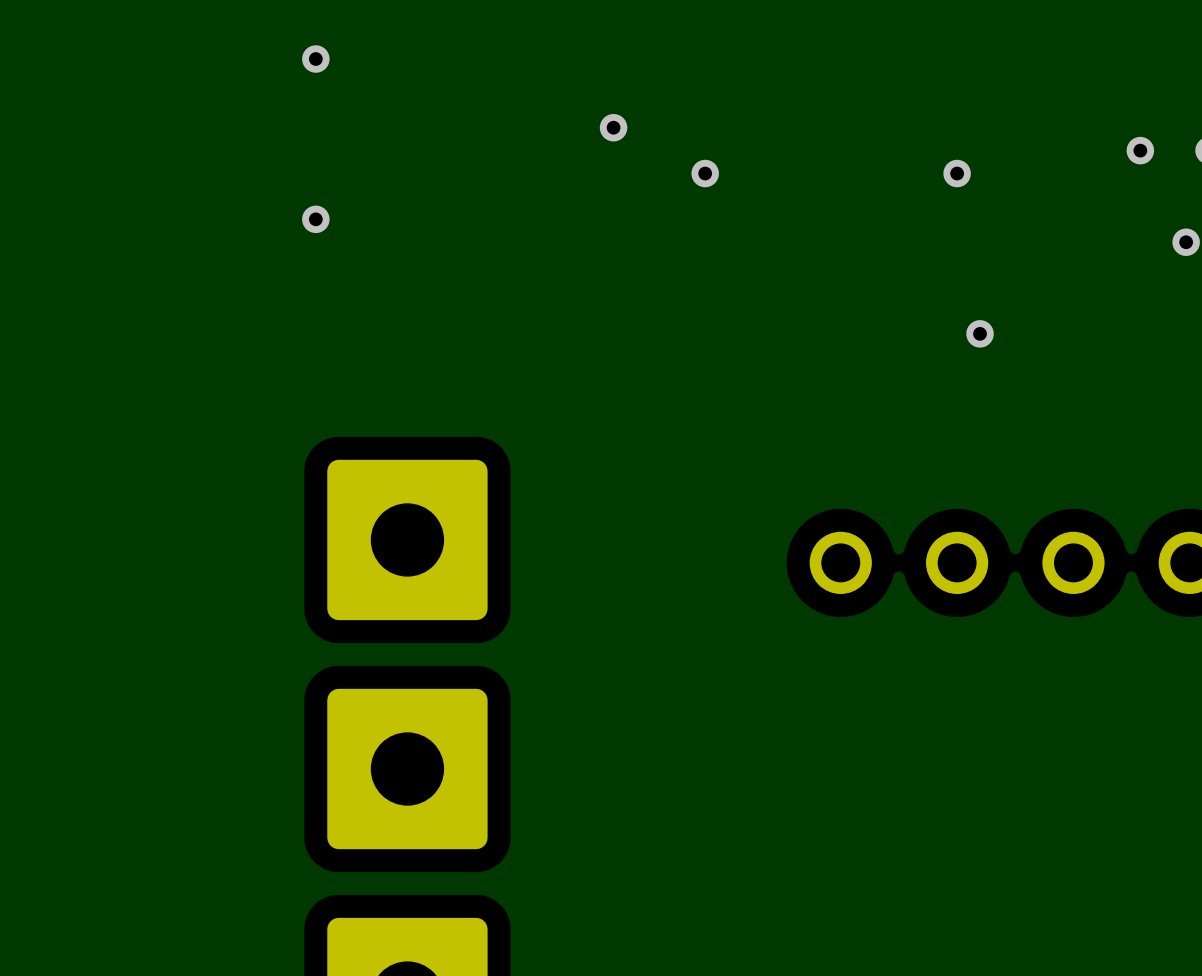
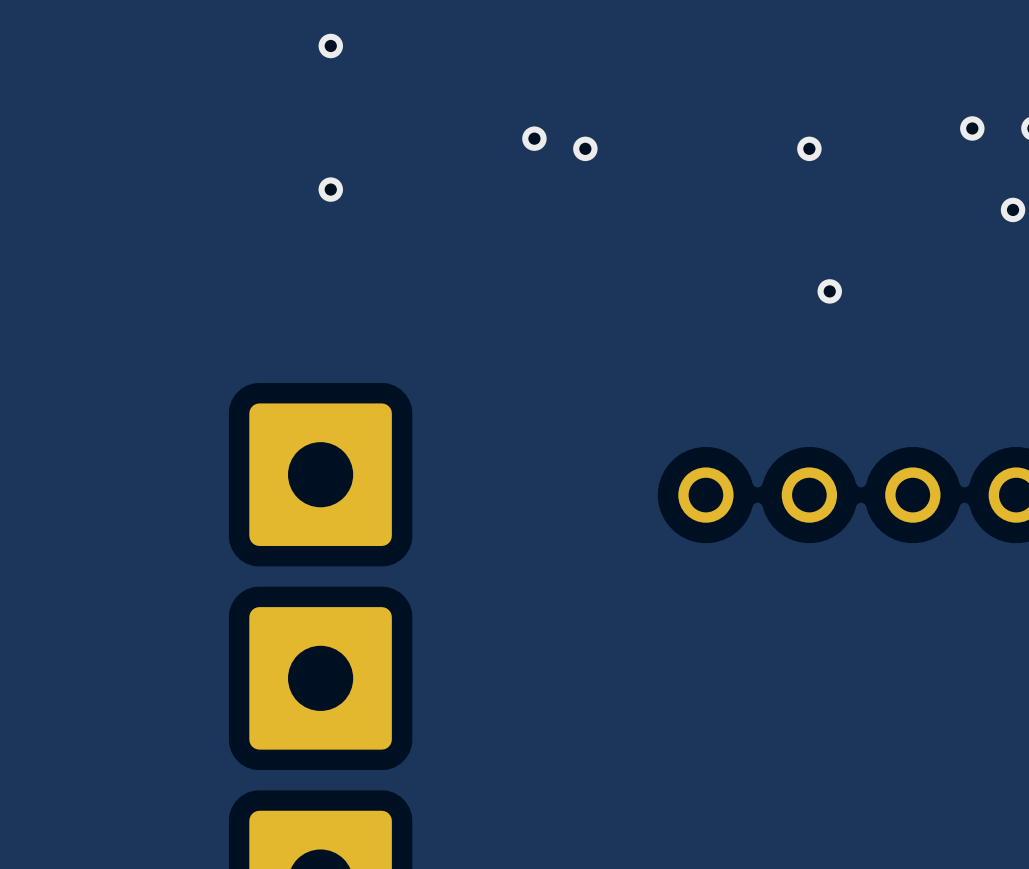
via: none -> (330, 45)
via: (315, 59) -> none
via position: (613, 127) -> (534, 138)
via: (315, 219) -> none
via: none -> (330, 189)

